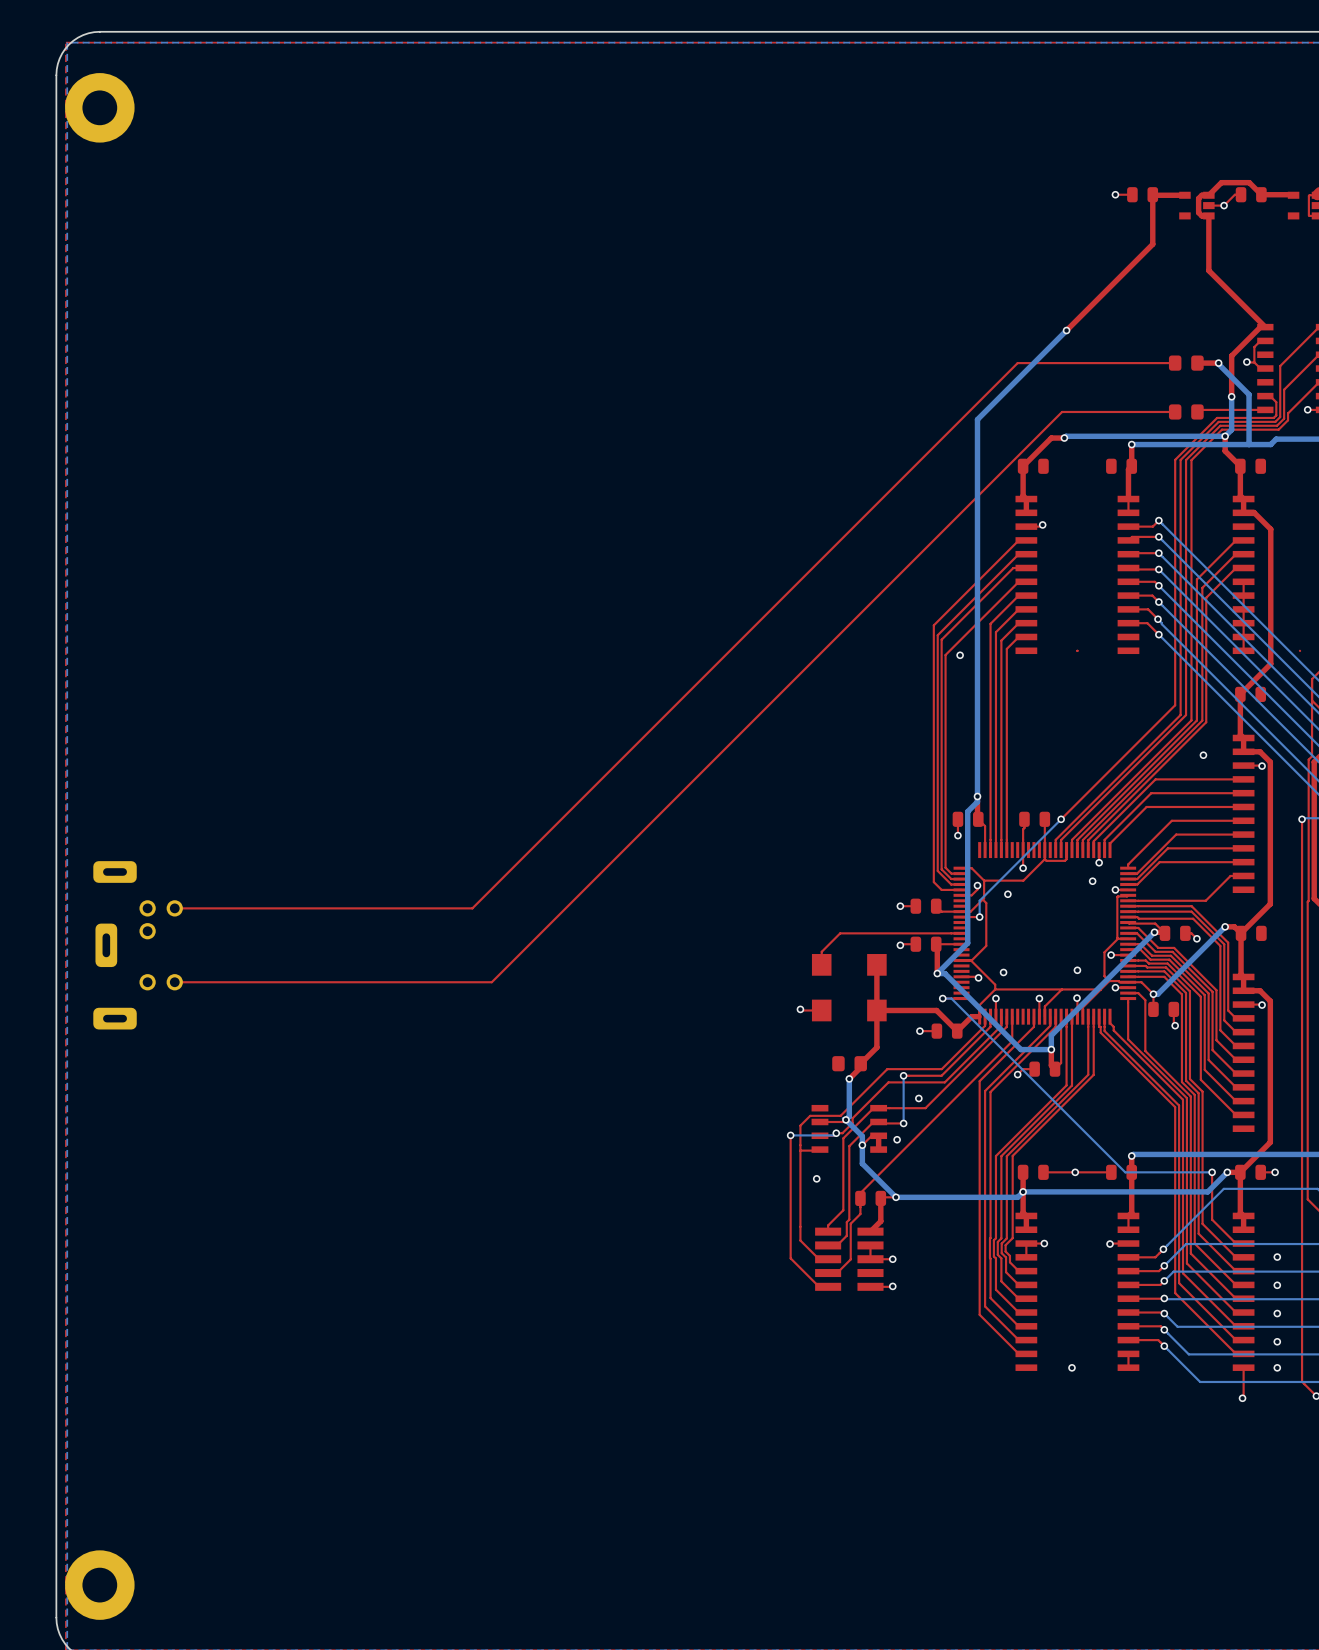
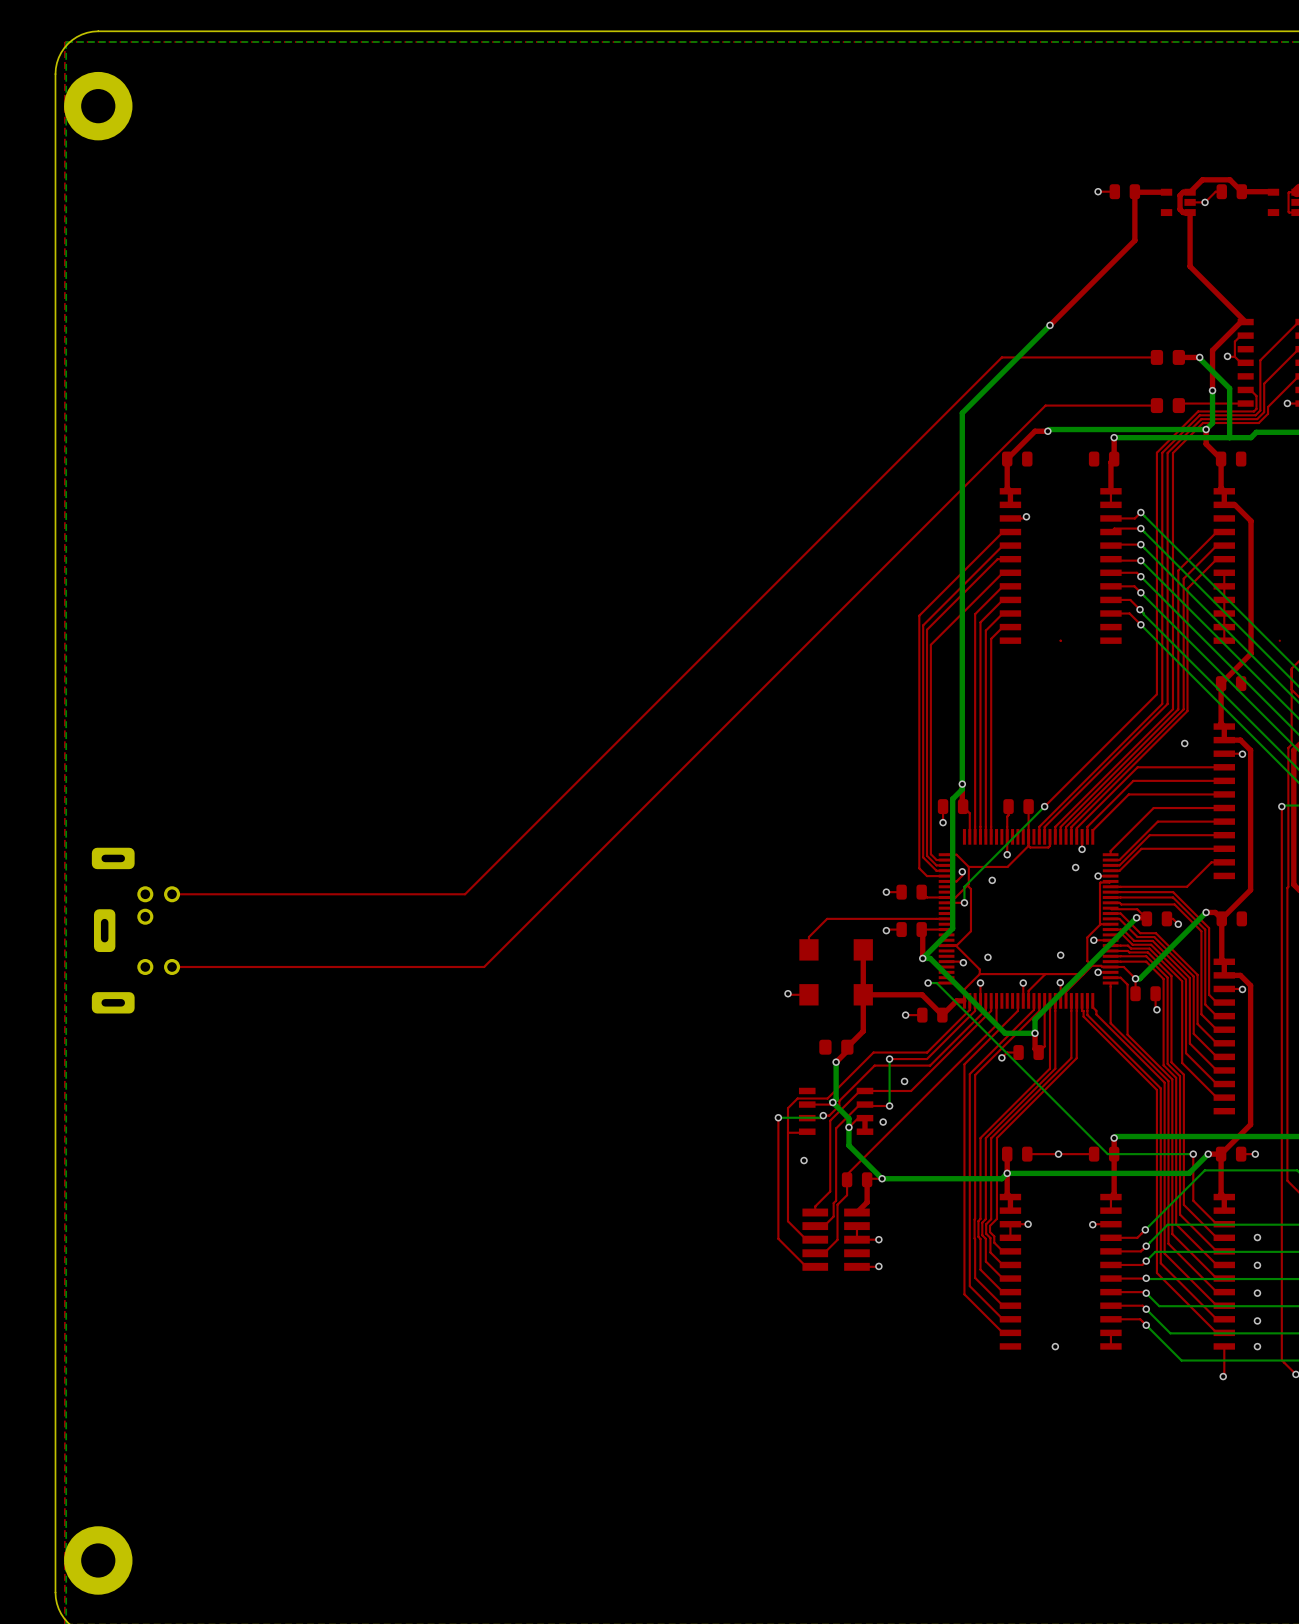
via: (960, 655) -> none

